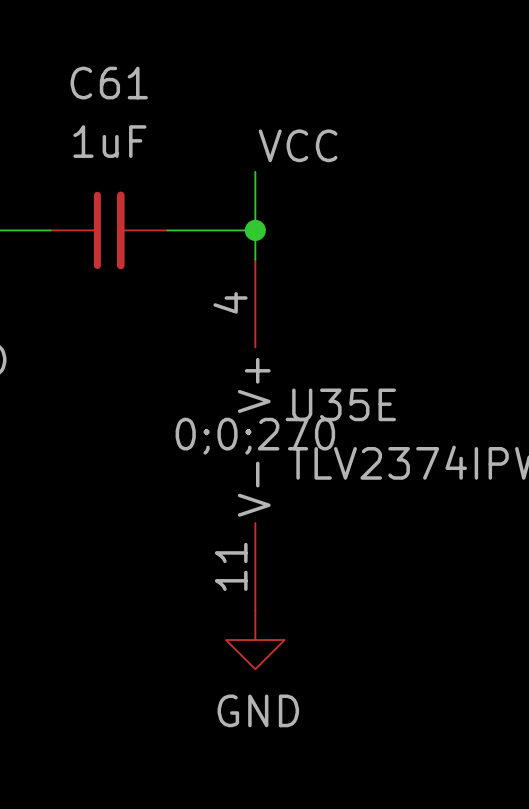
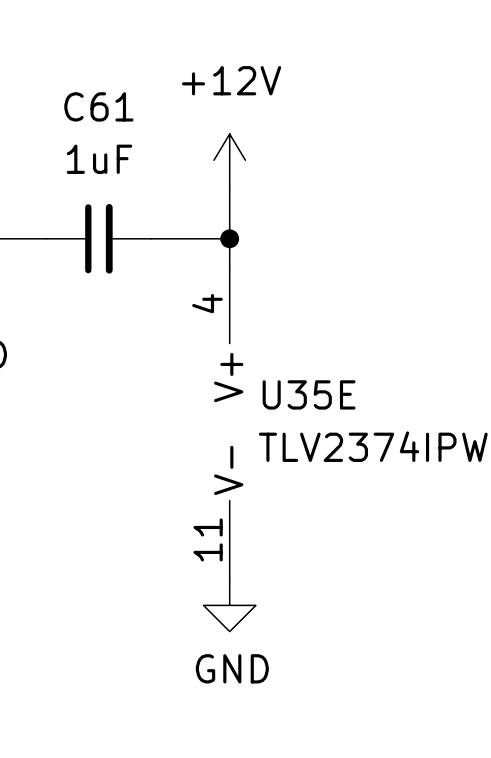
power symbol: none -> +12V (229, 160)
label: VCC (298, 145) -> none
U35E text: 0;0;270 (255, 436) -> none

